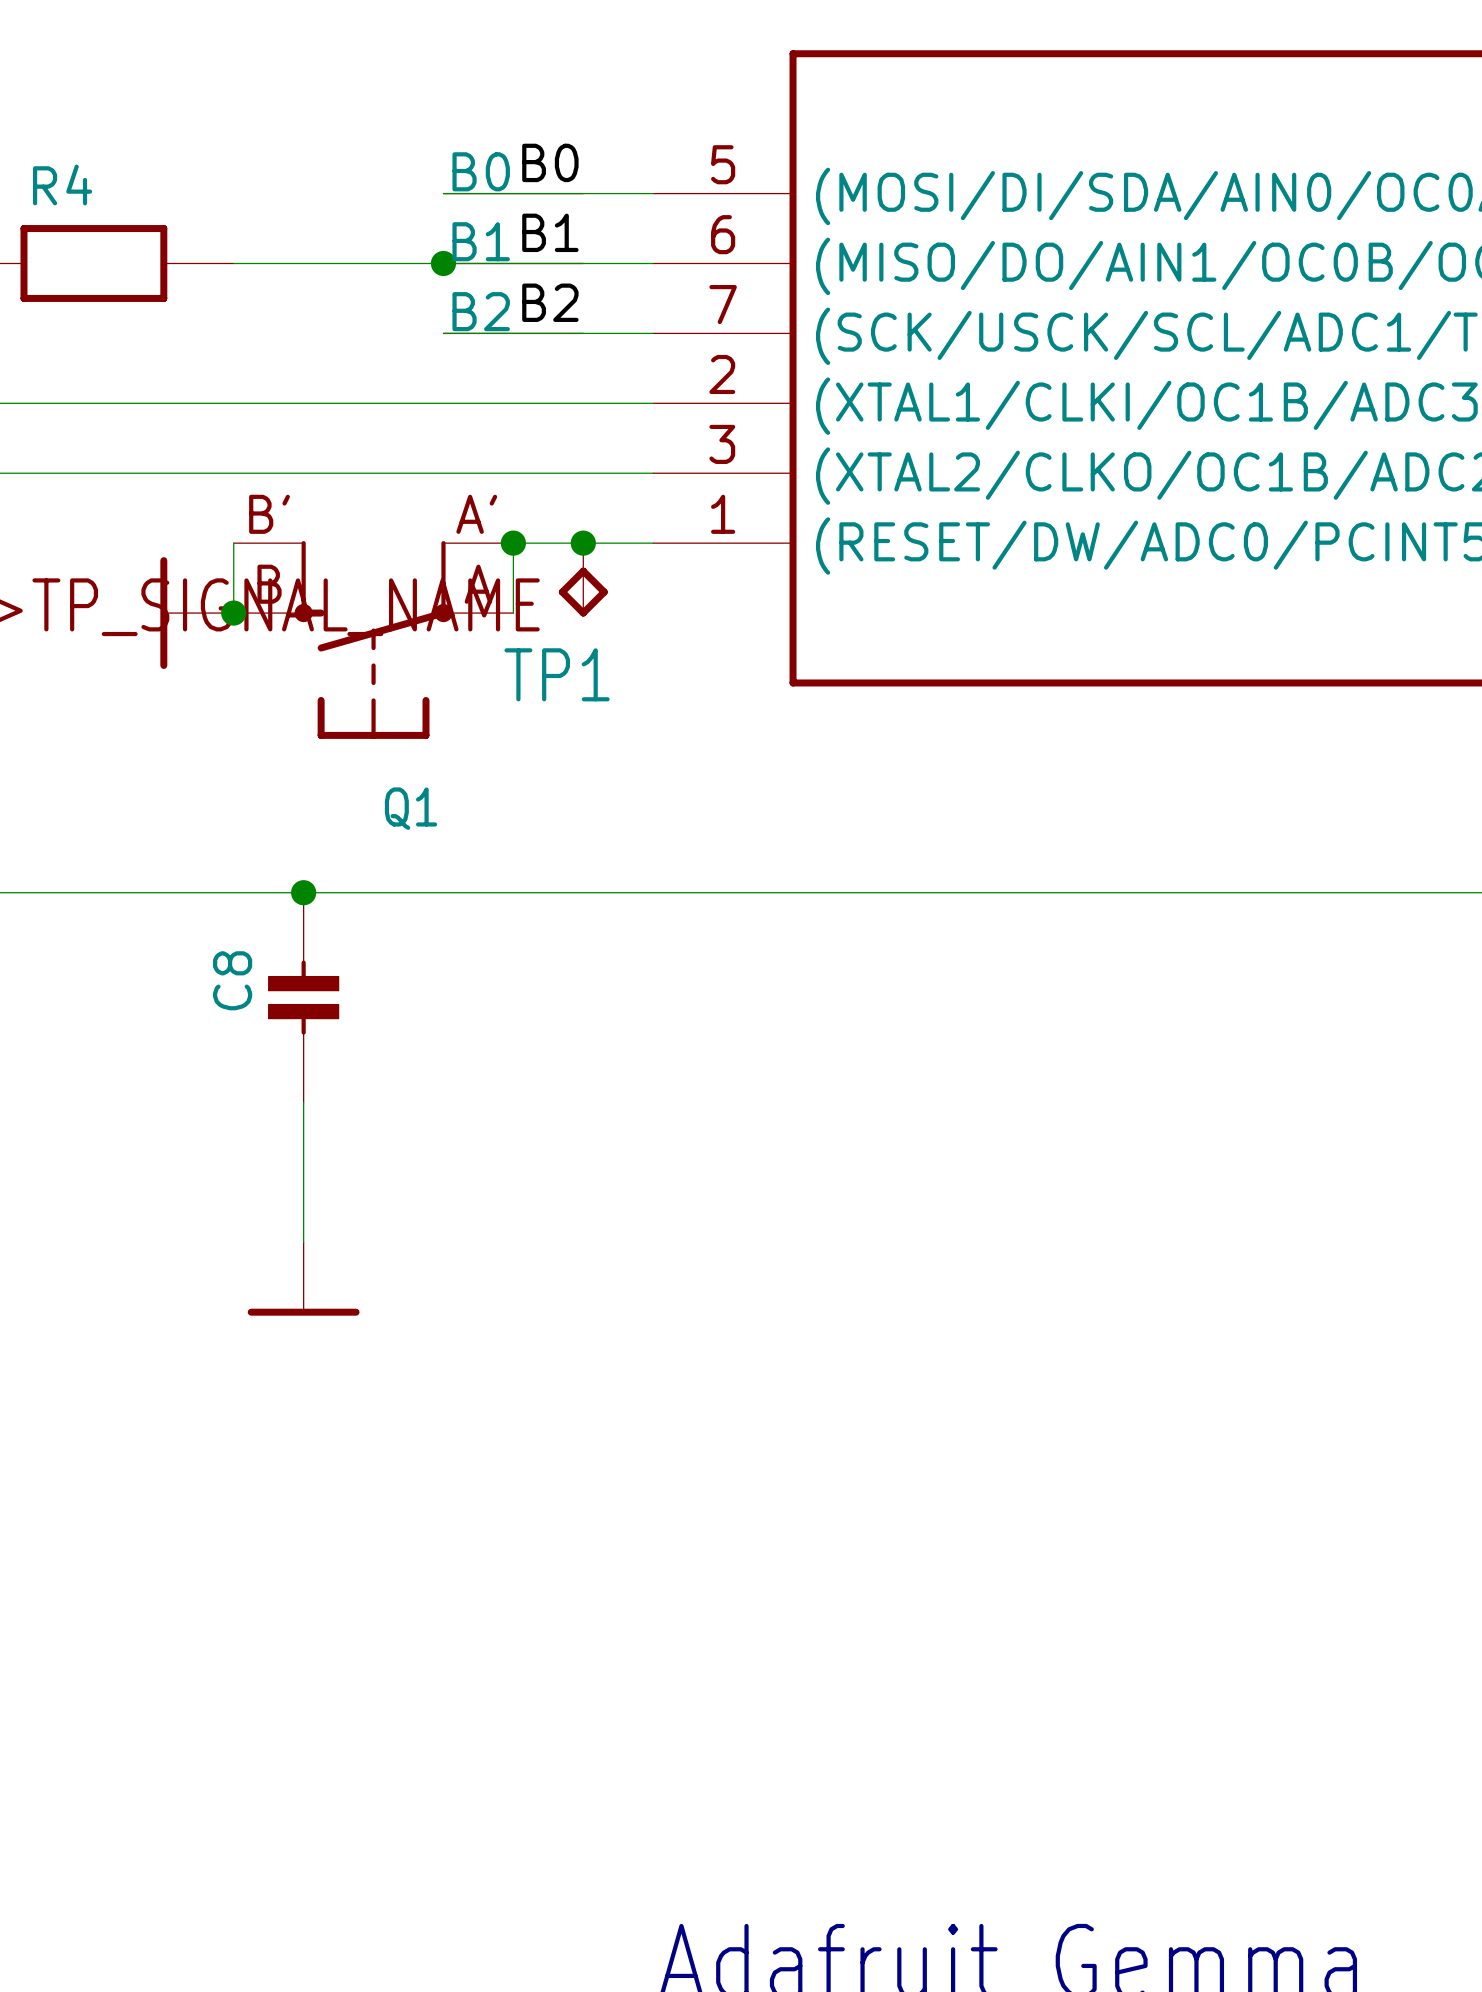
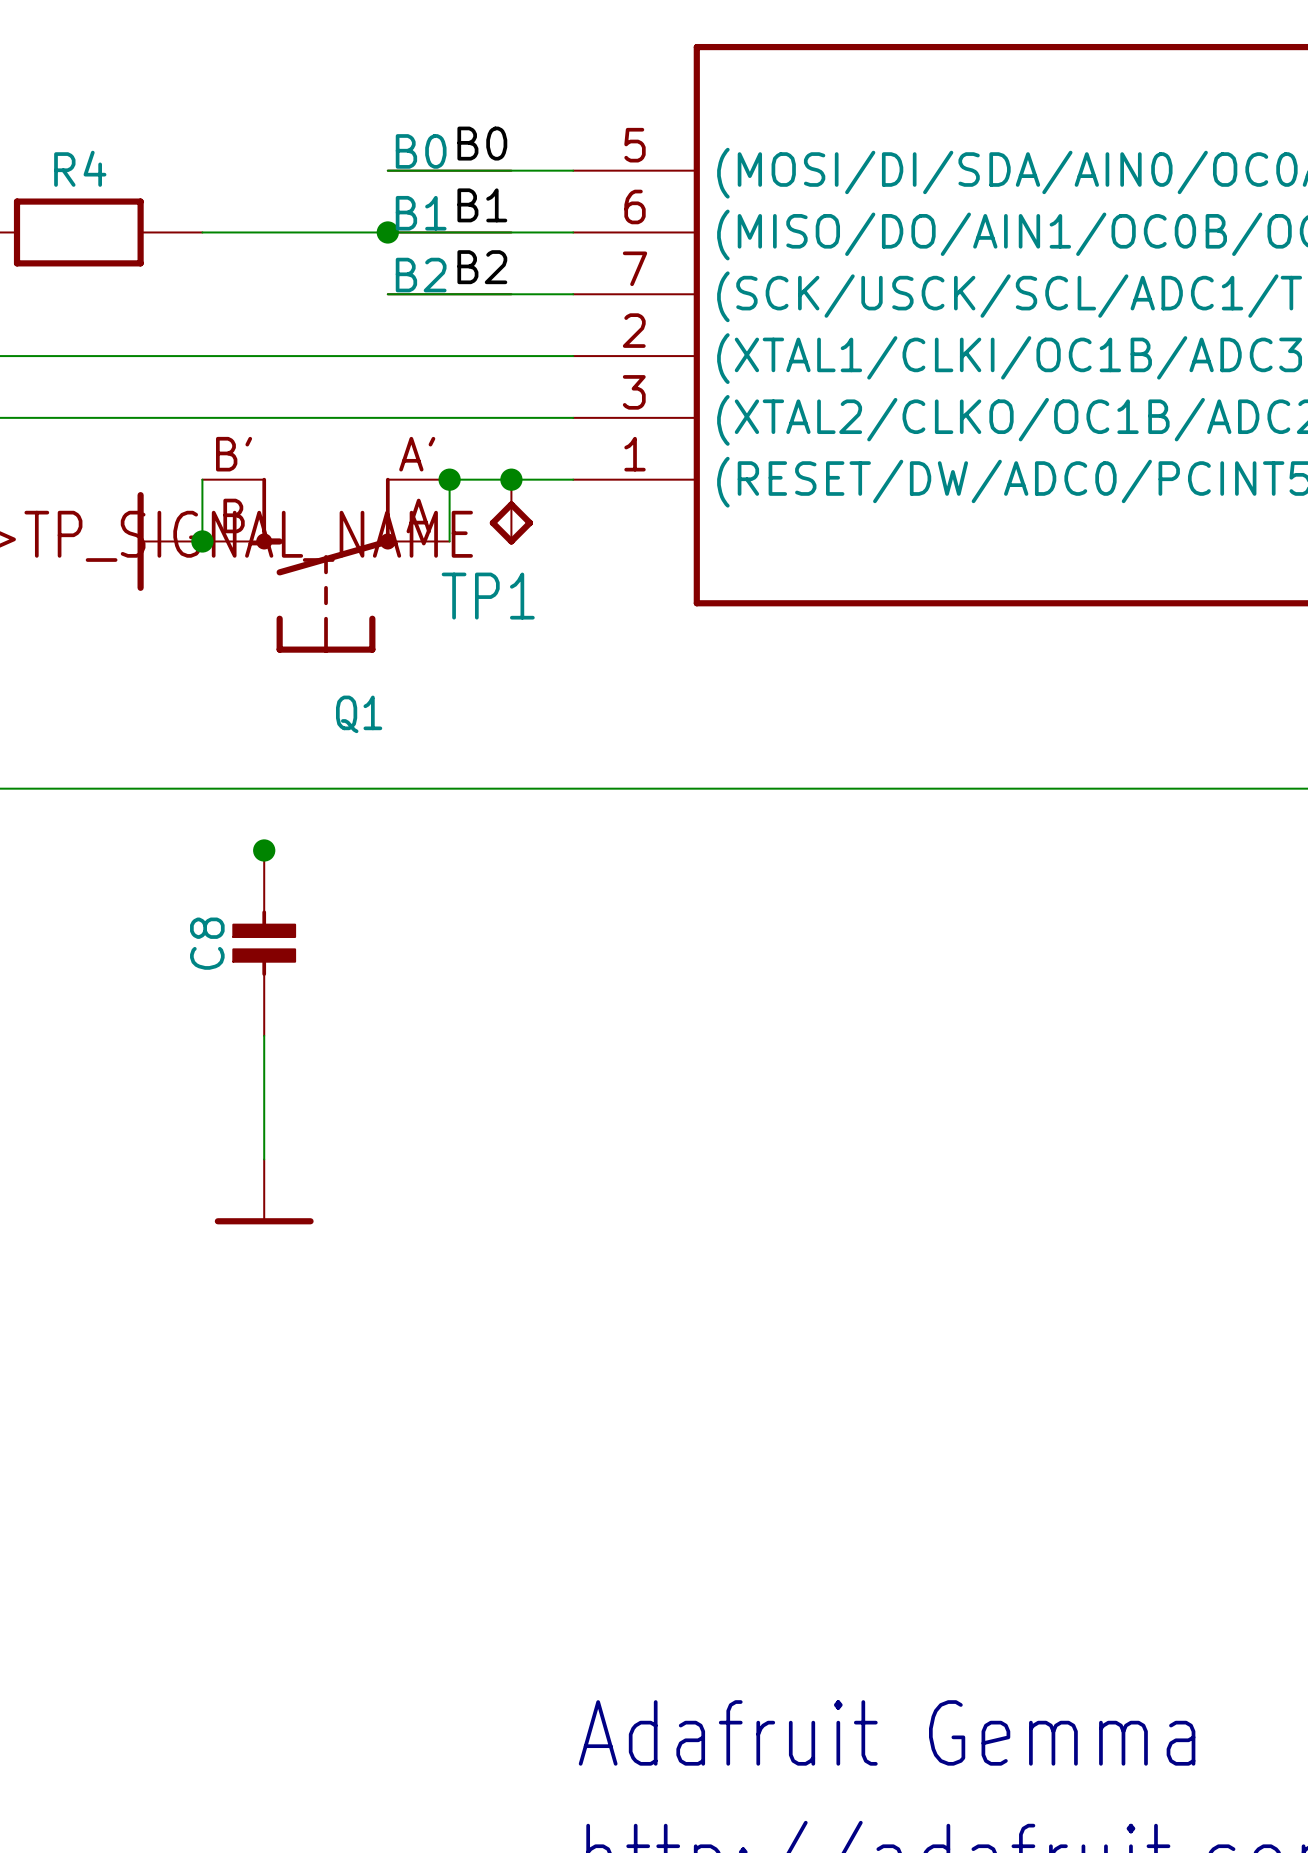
R4 name position: R4 (62, 184) -> R4 (80, 168)
junction position: (303, 892) -> (264, 850)
C8 name position: C8 (232, 980) -> C8 (207, 943)
C8 position: (303, 997) -> (264, 943)
power symbol position: (303, 1278) -> (264, 1191)

